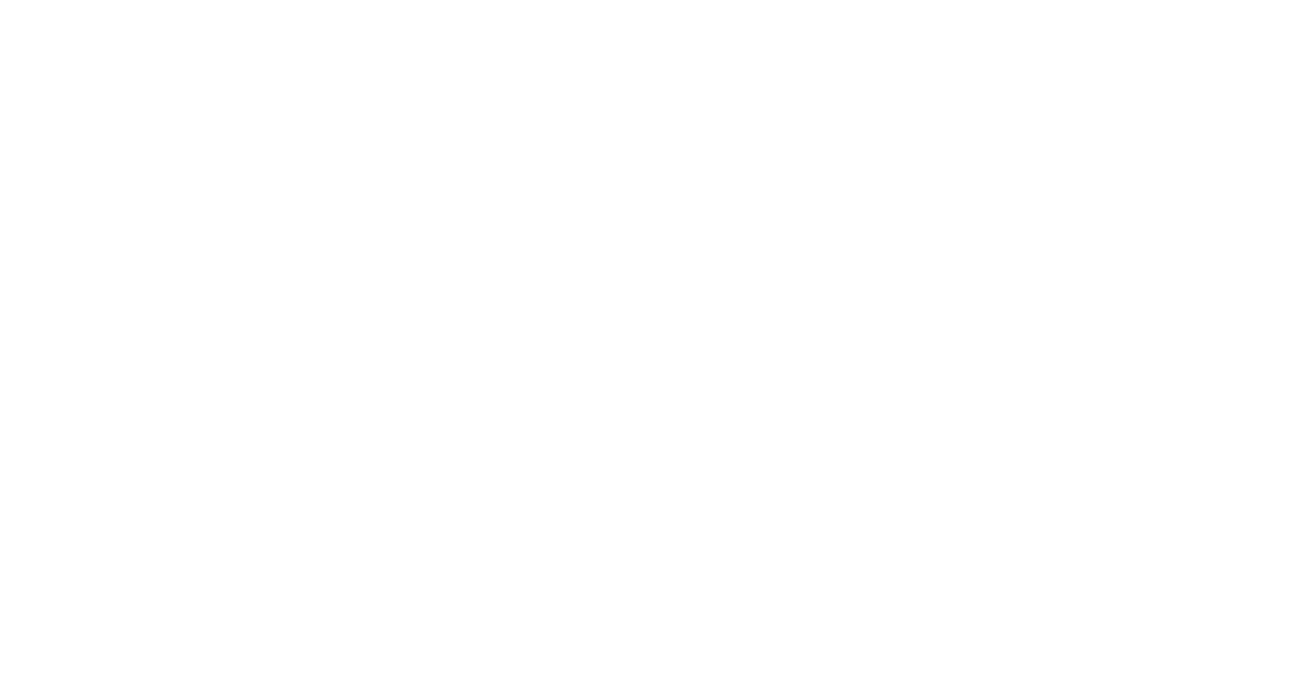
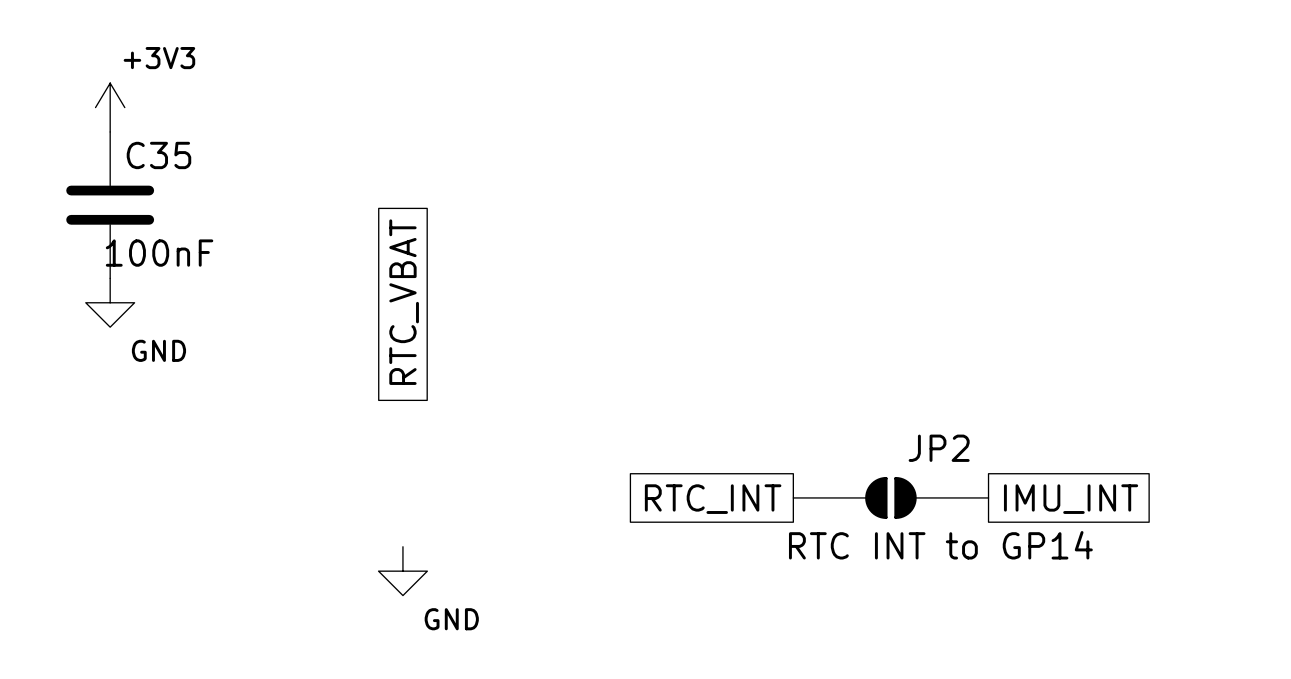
power symbol: none -> +3V3 (110, 107)
C35: none -> 100nF (110, 205)
power symbol: none -> GND (110, 302)
global label: none -> RTC_VBAT (404, 302)
JP2: none -> RTC INT to GP14 (890, 497)
global label: none -> RTC_INT (713, 499)
global label: none -> IMU_INT (1071, 499)
power symbol: none -> GND (402, 571)

